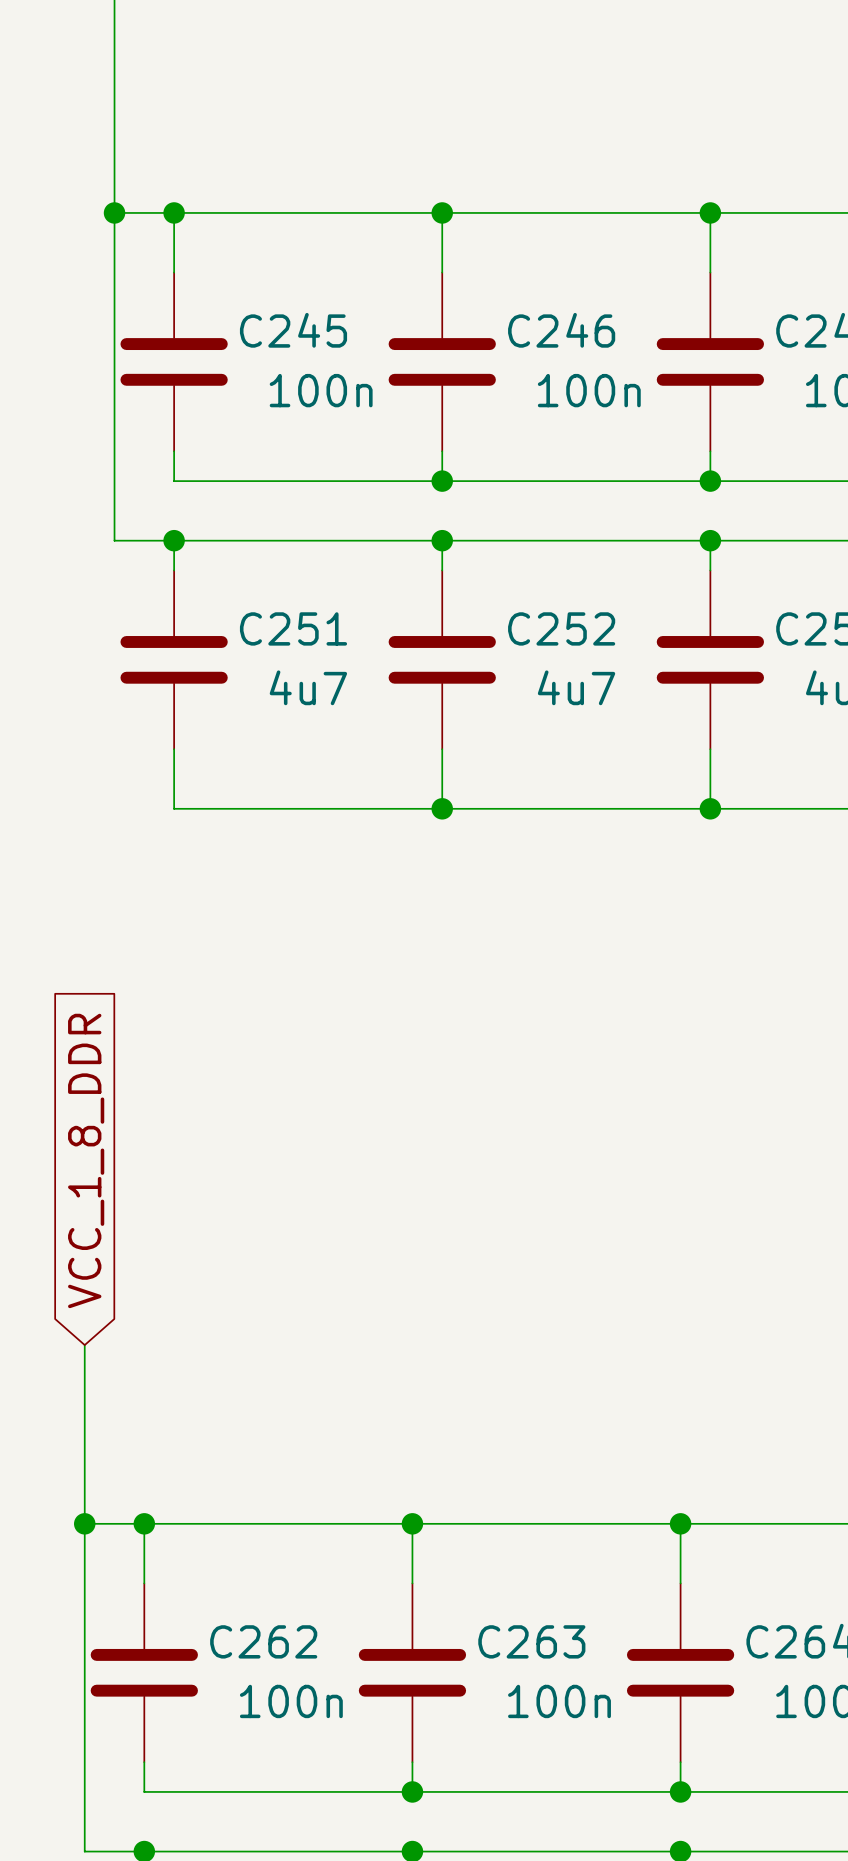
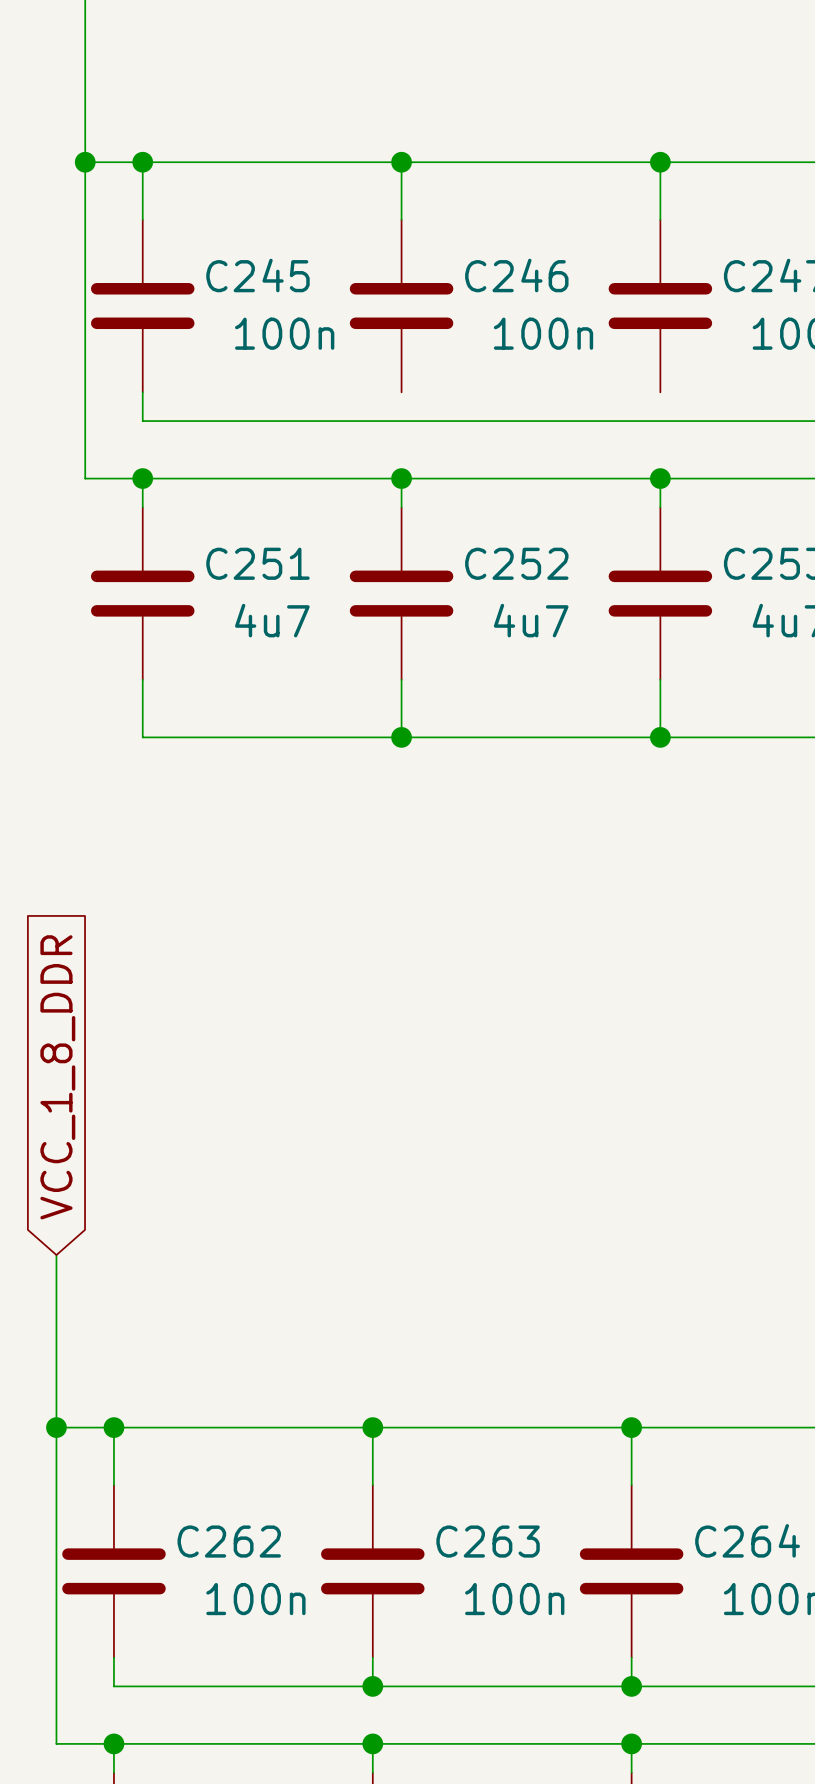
wire: (442, 451) (442, 481) -> none
wire: (710, 451) (710, 481) -> none
junction: (442, 481) -> none
junction: (710, 481) -> none

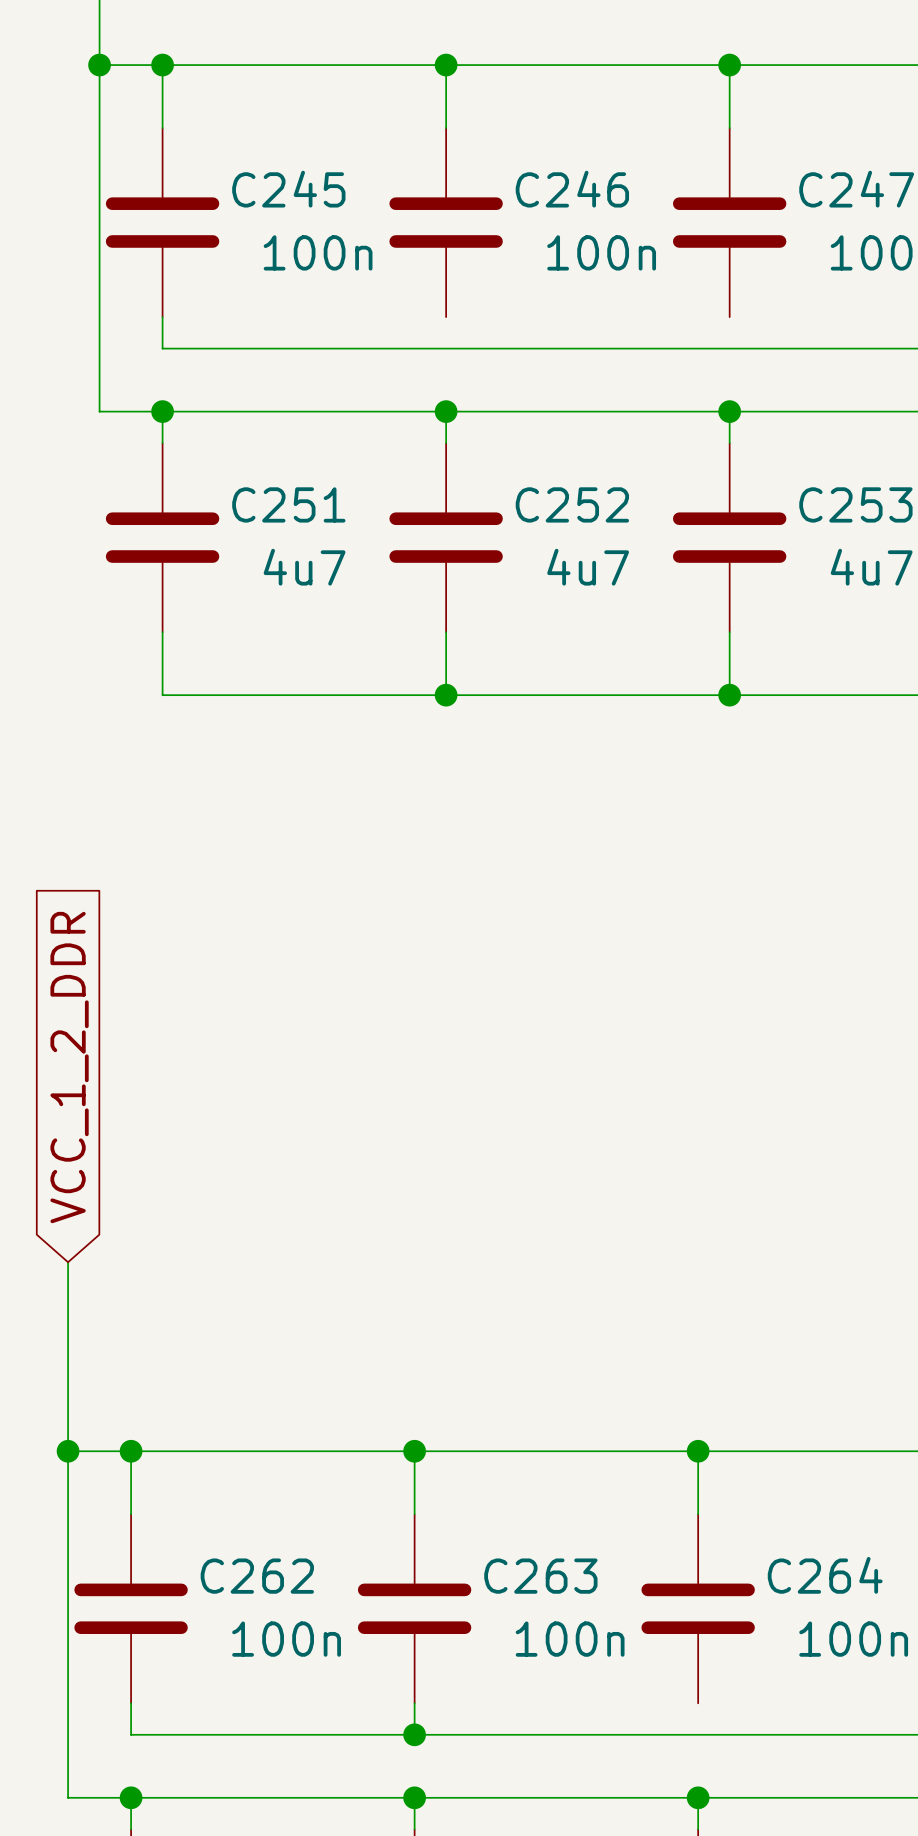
global label: VCC_1_8_DDR (57, 1077) -> VCC_1_2_DDR (69, 1067)
wire: (631, 1657) (631, 1686) -> none
junction: (631, 1686) -> none

